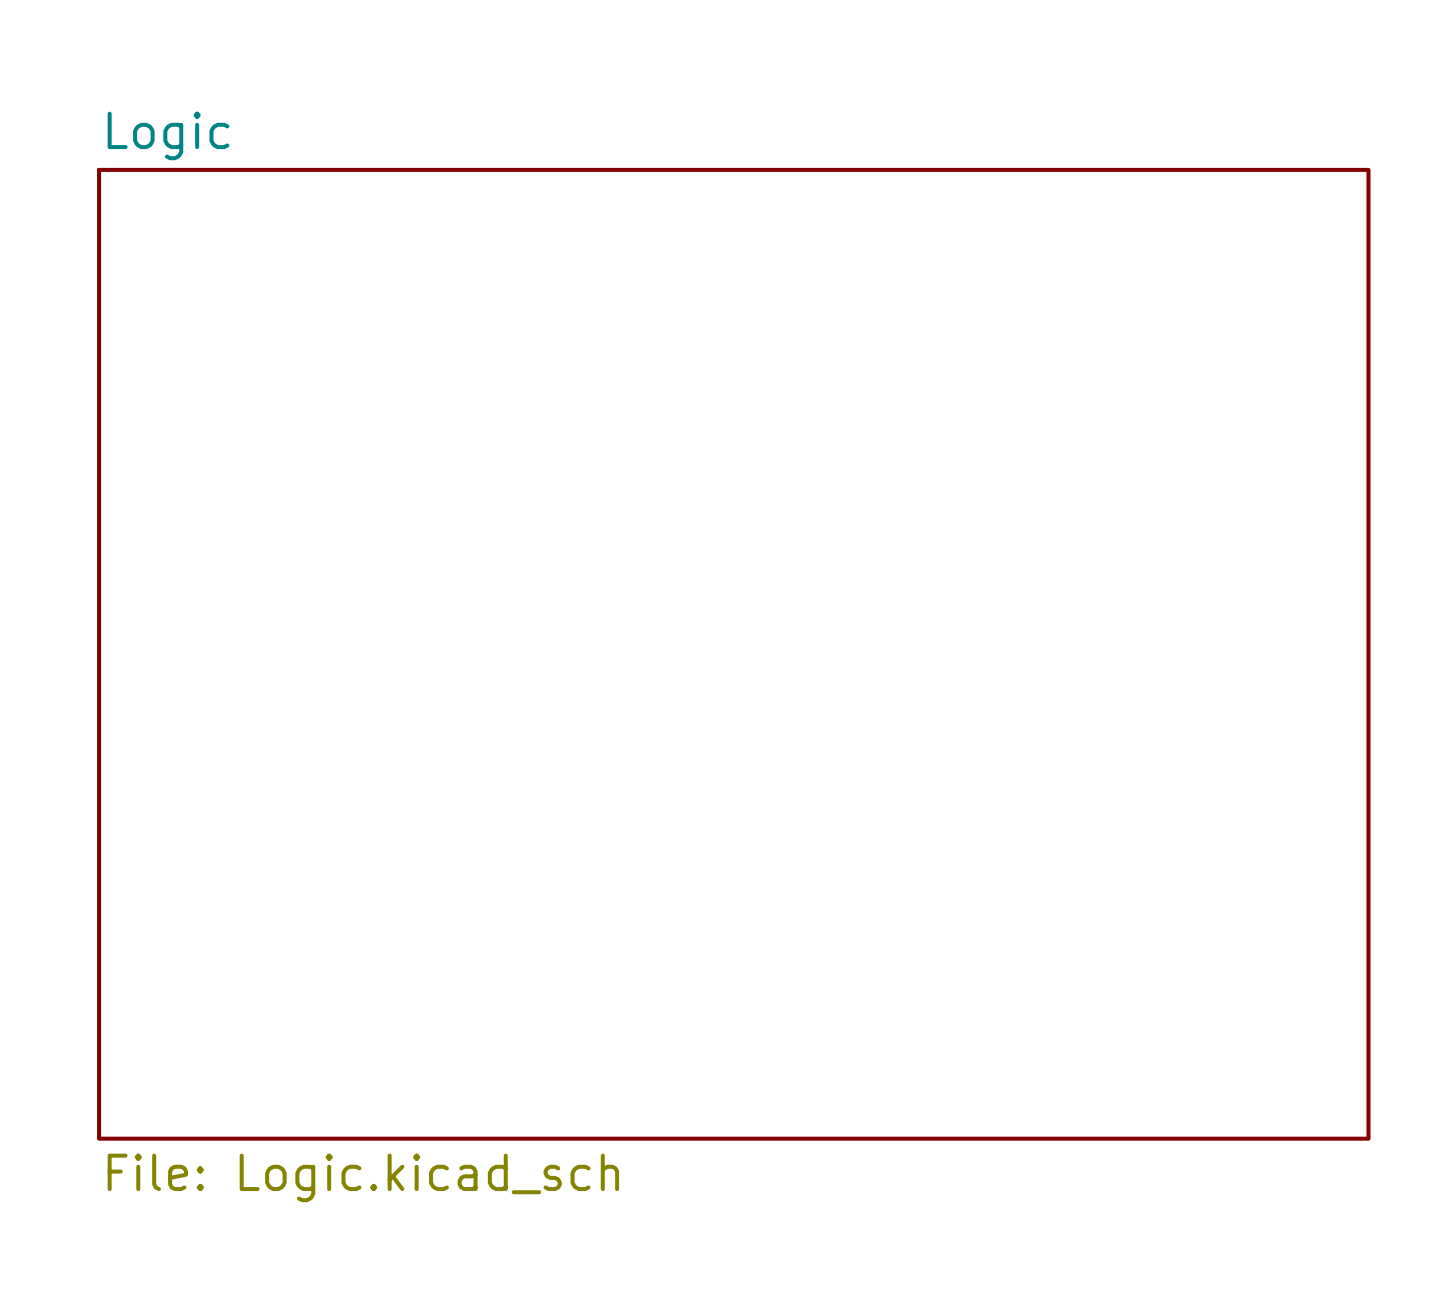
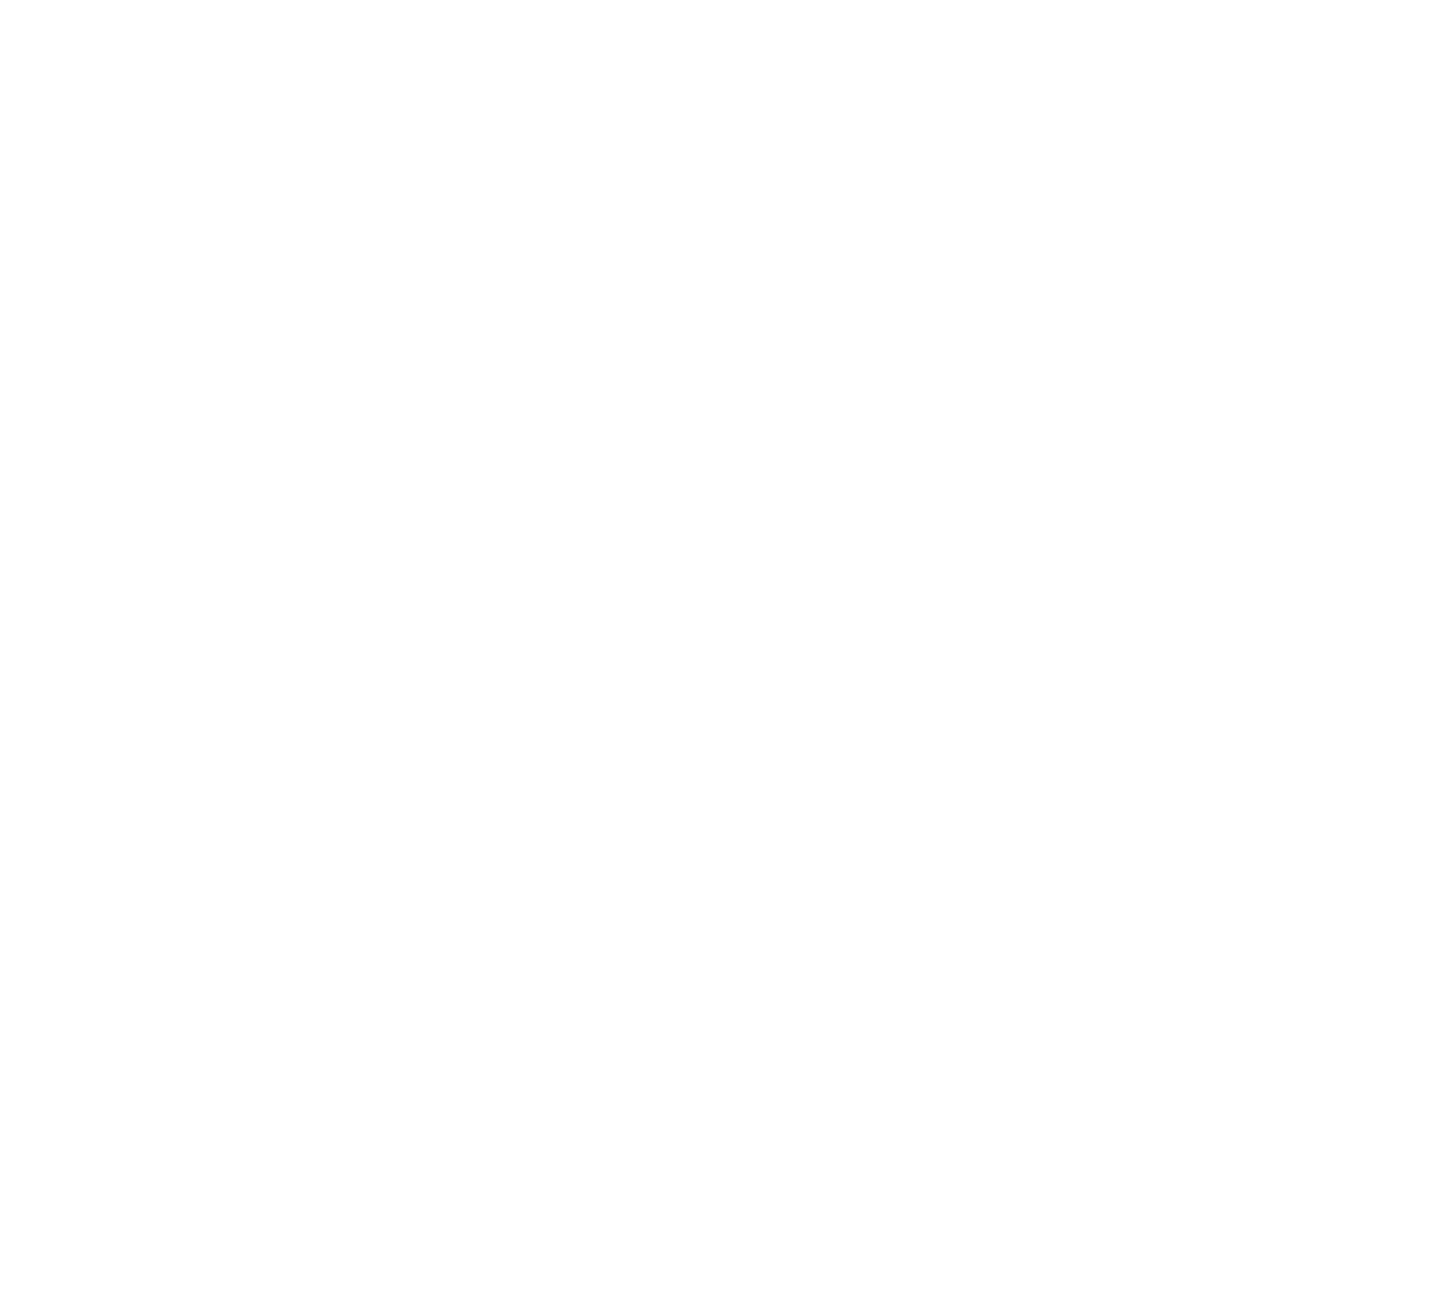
sheet Logic: File: Logic.kicad_sch (733, 654) -> none

